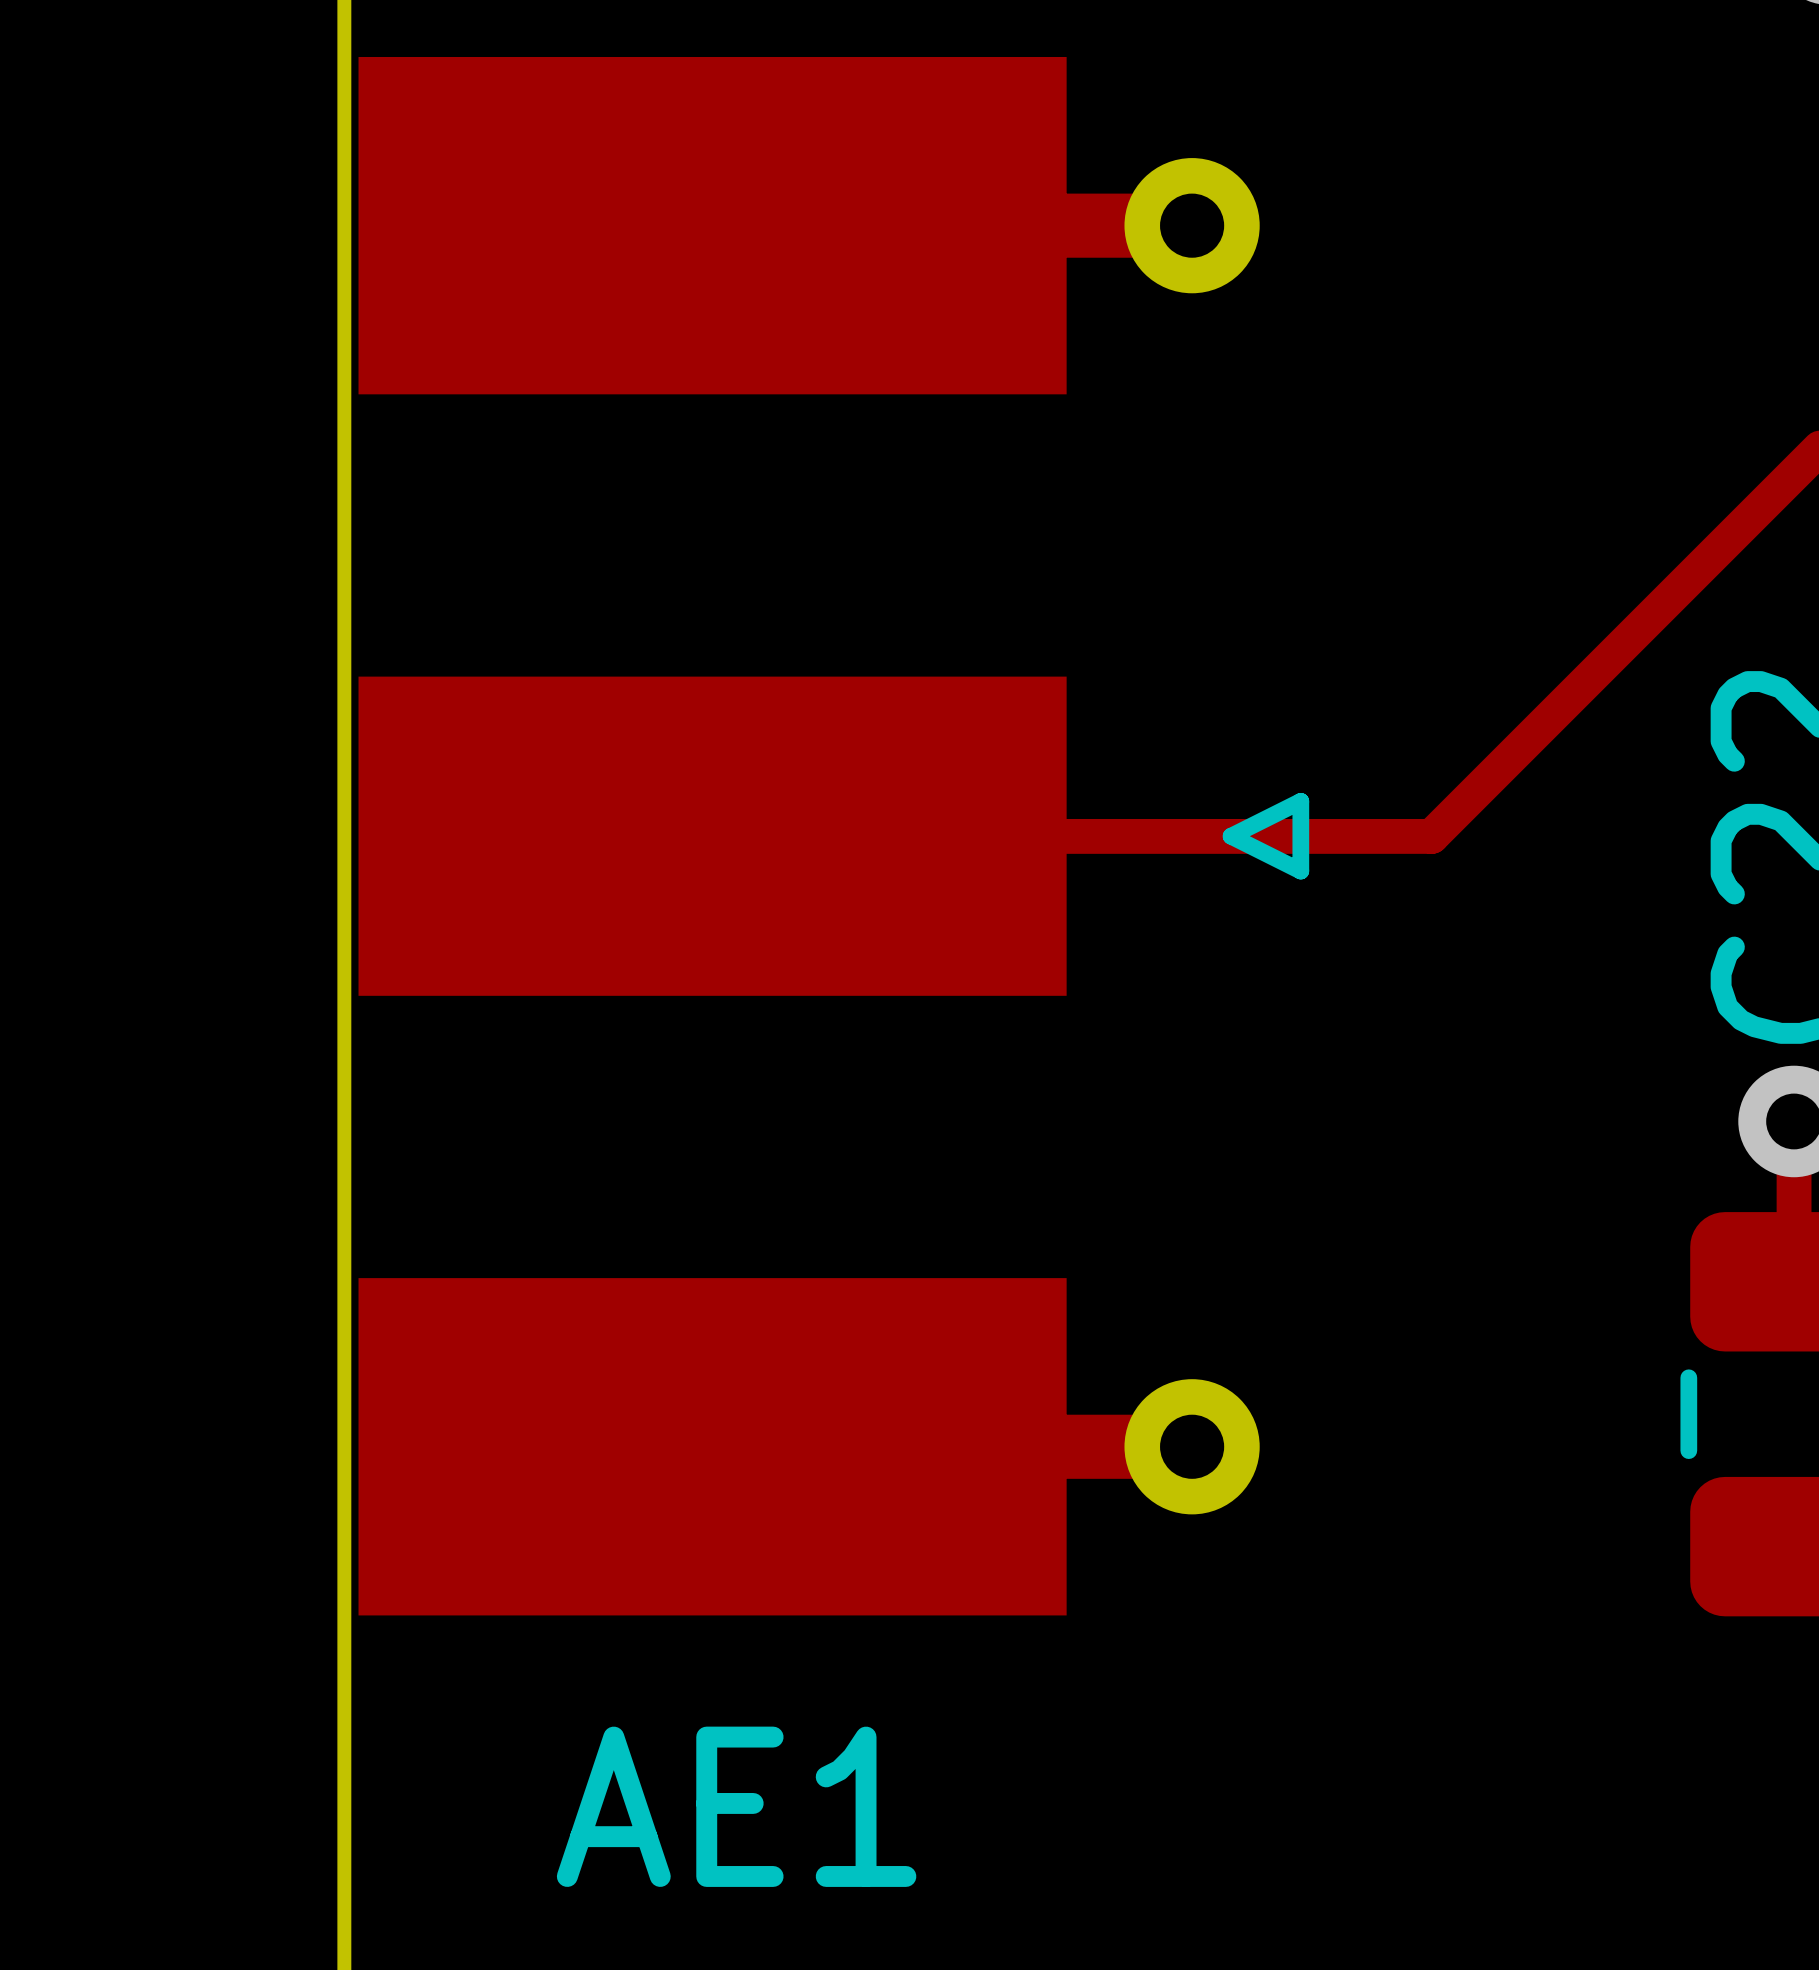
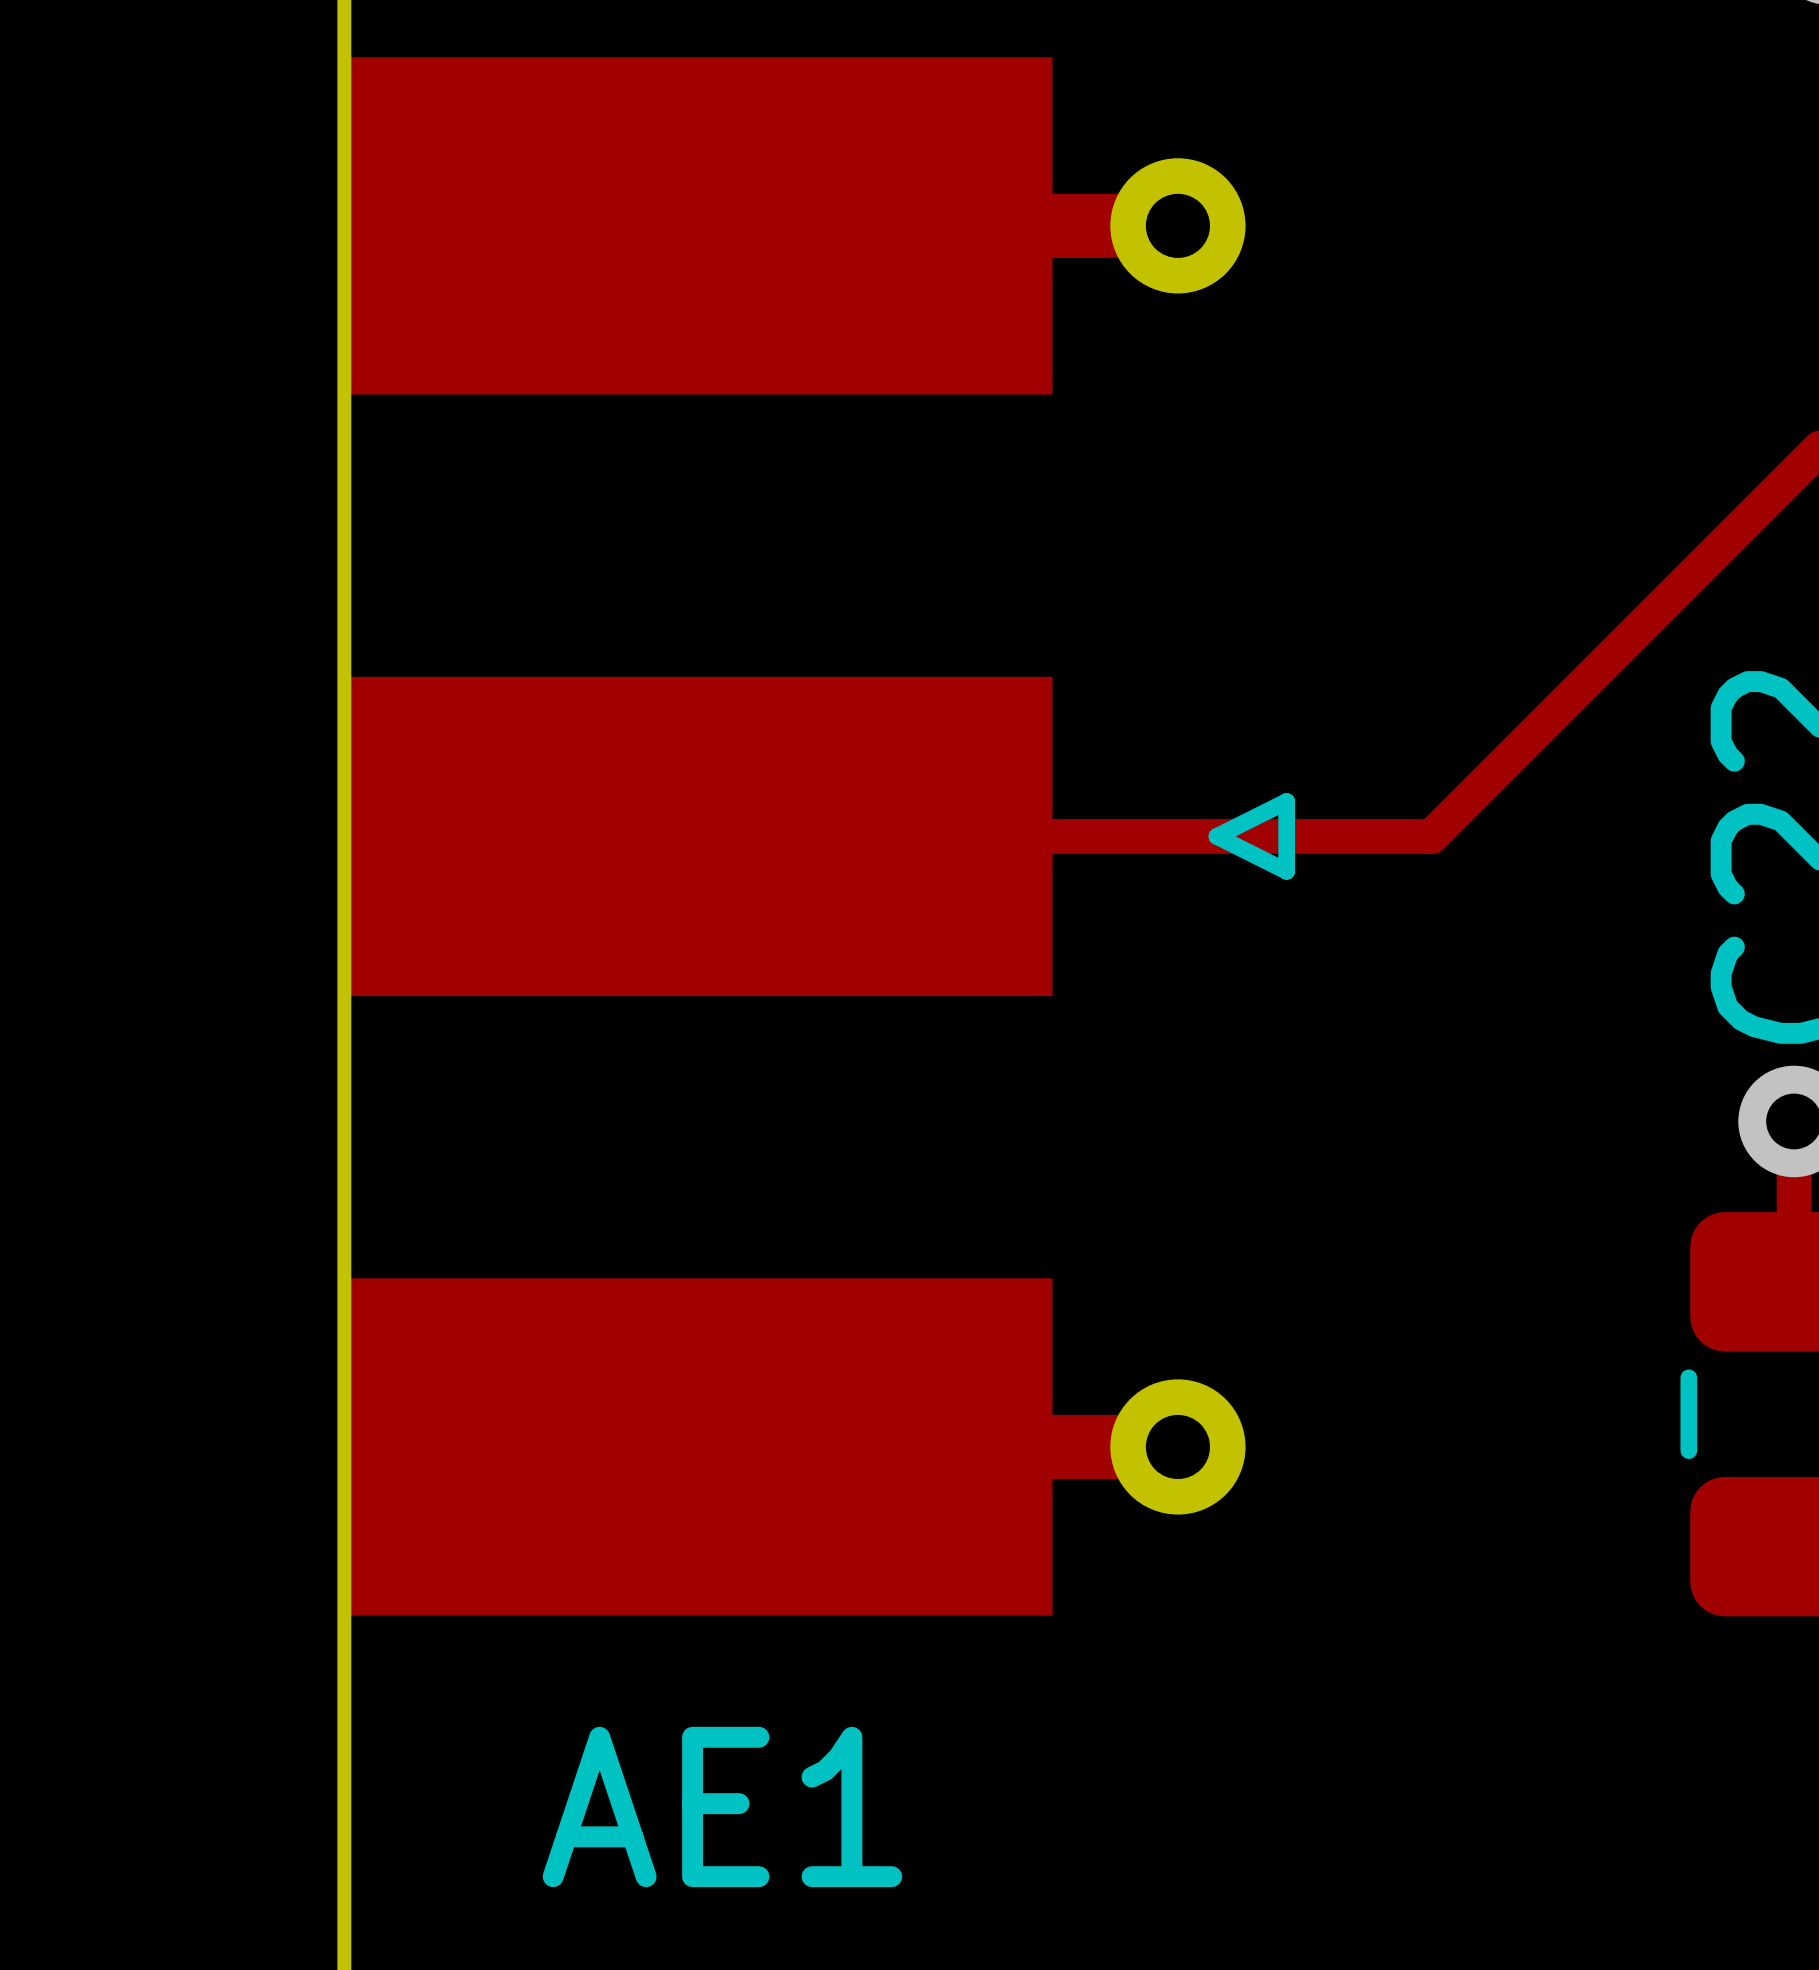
AE1 position: (833, 836) -> (819, 836)

